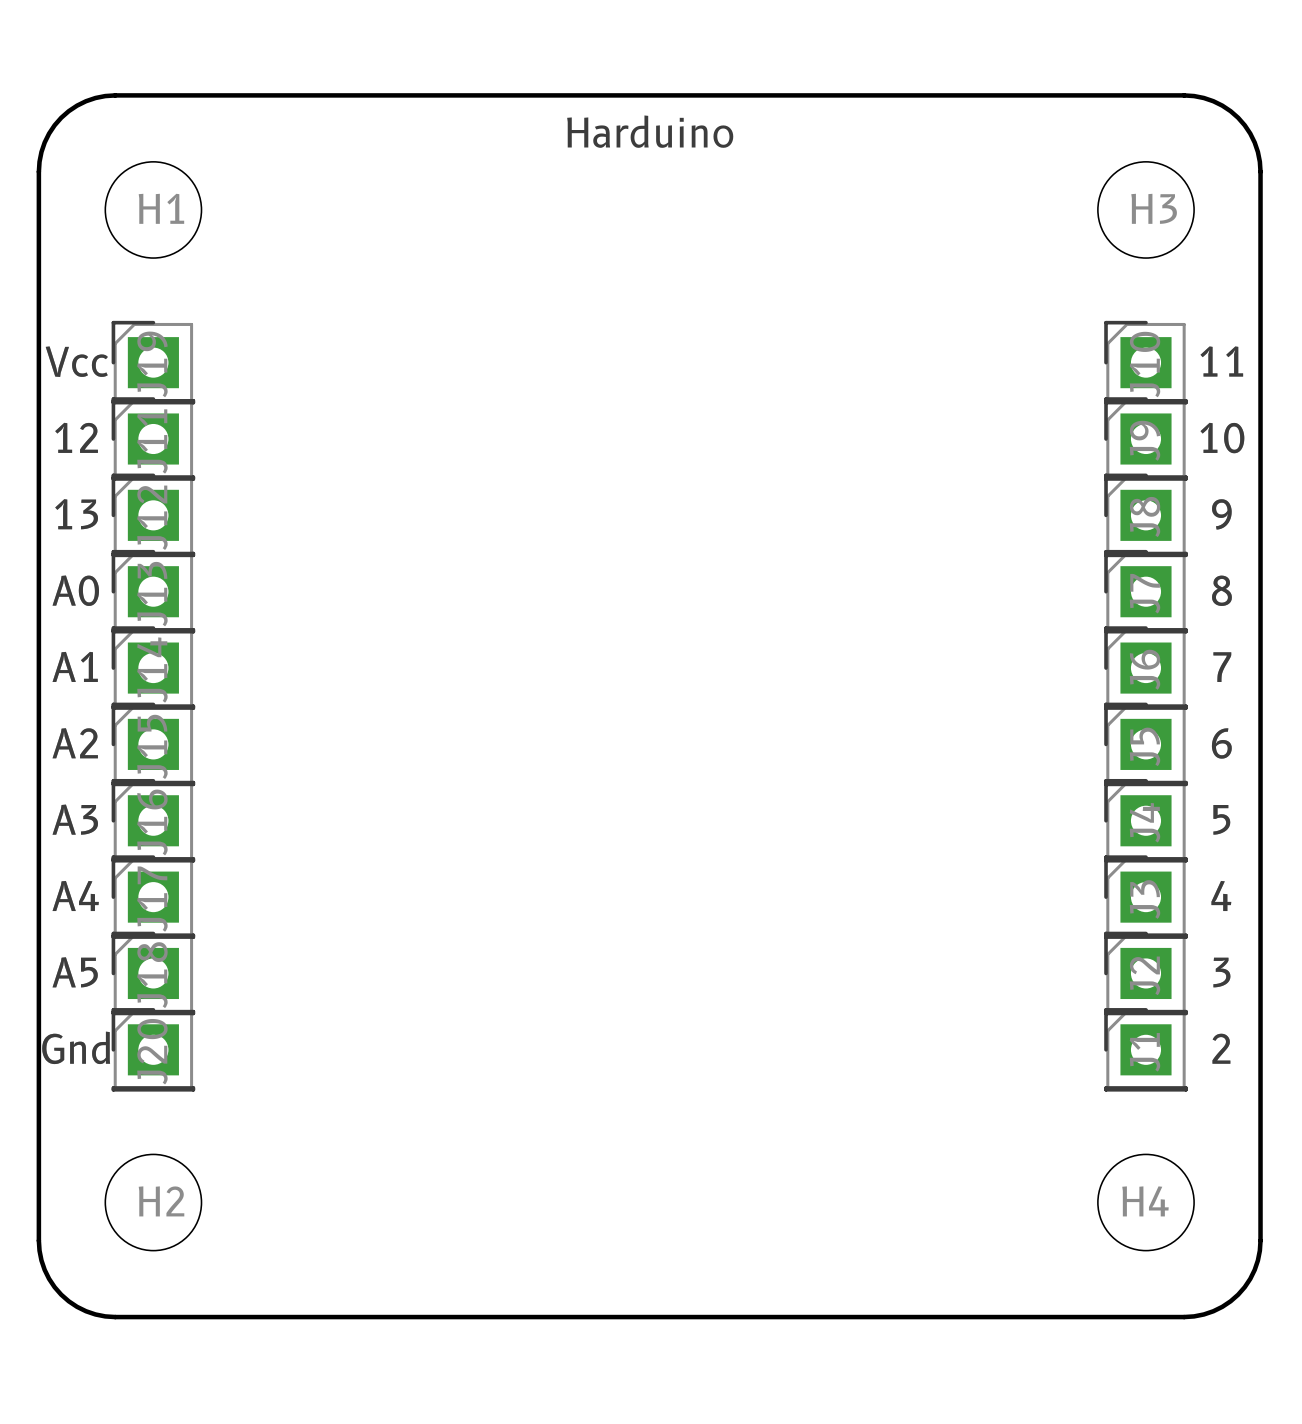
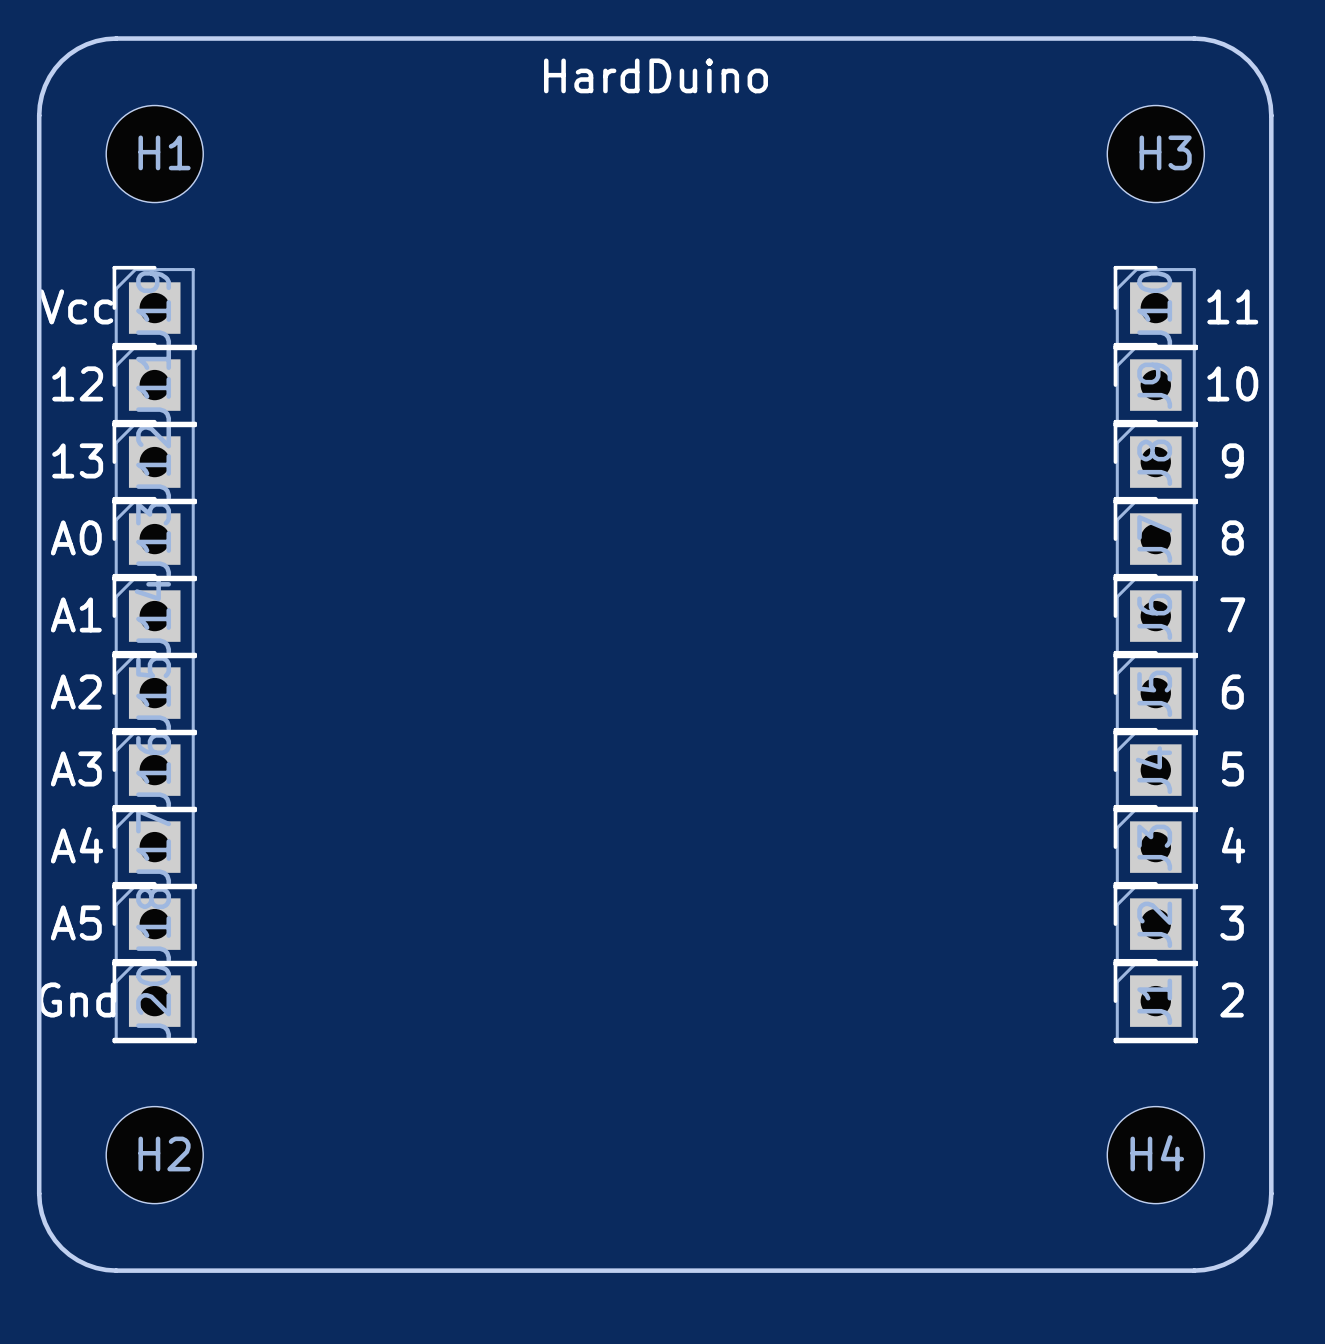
text: Harduino (650, 131) -> HardDuino (655, 75)

